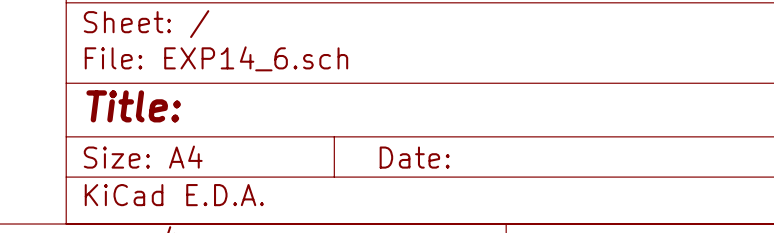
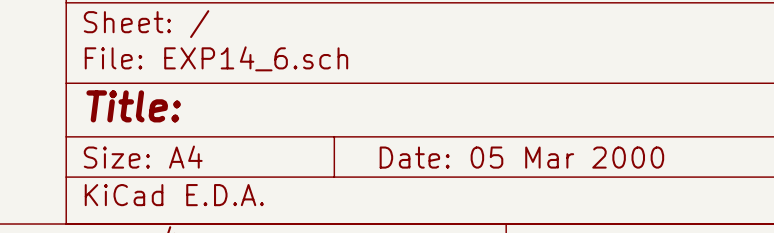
title block: Date: (414, 157) -> Date: 05 Mar 2000 (521, 157)

